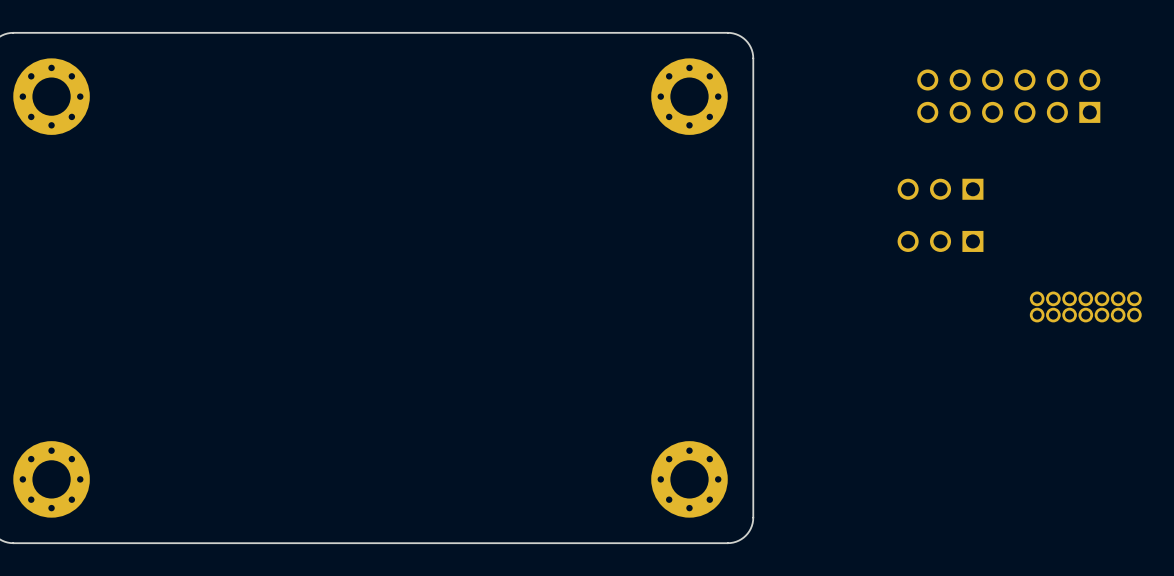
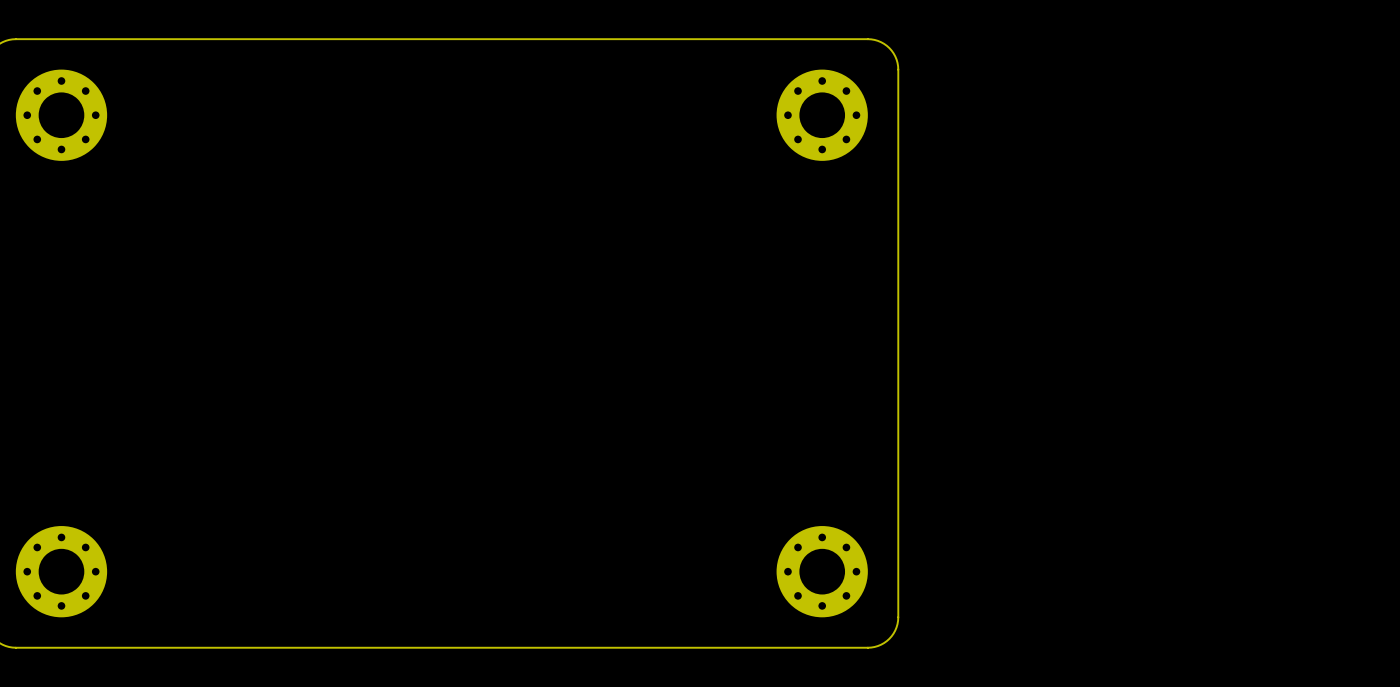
part: (1008, 96) -> none
part: (940, 189) -> none
part: (940, 241) -> none
part: (1085, 306) -> none

